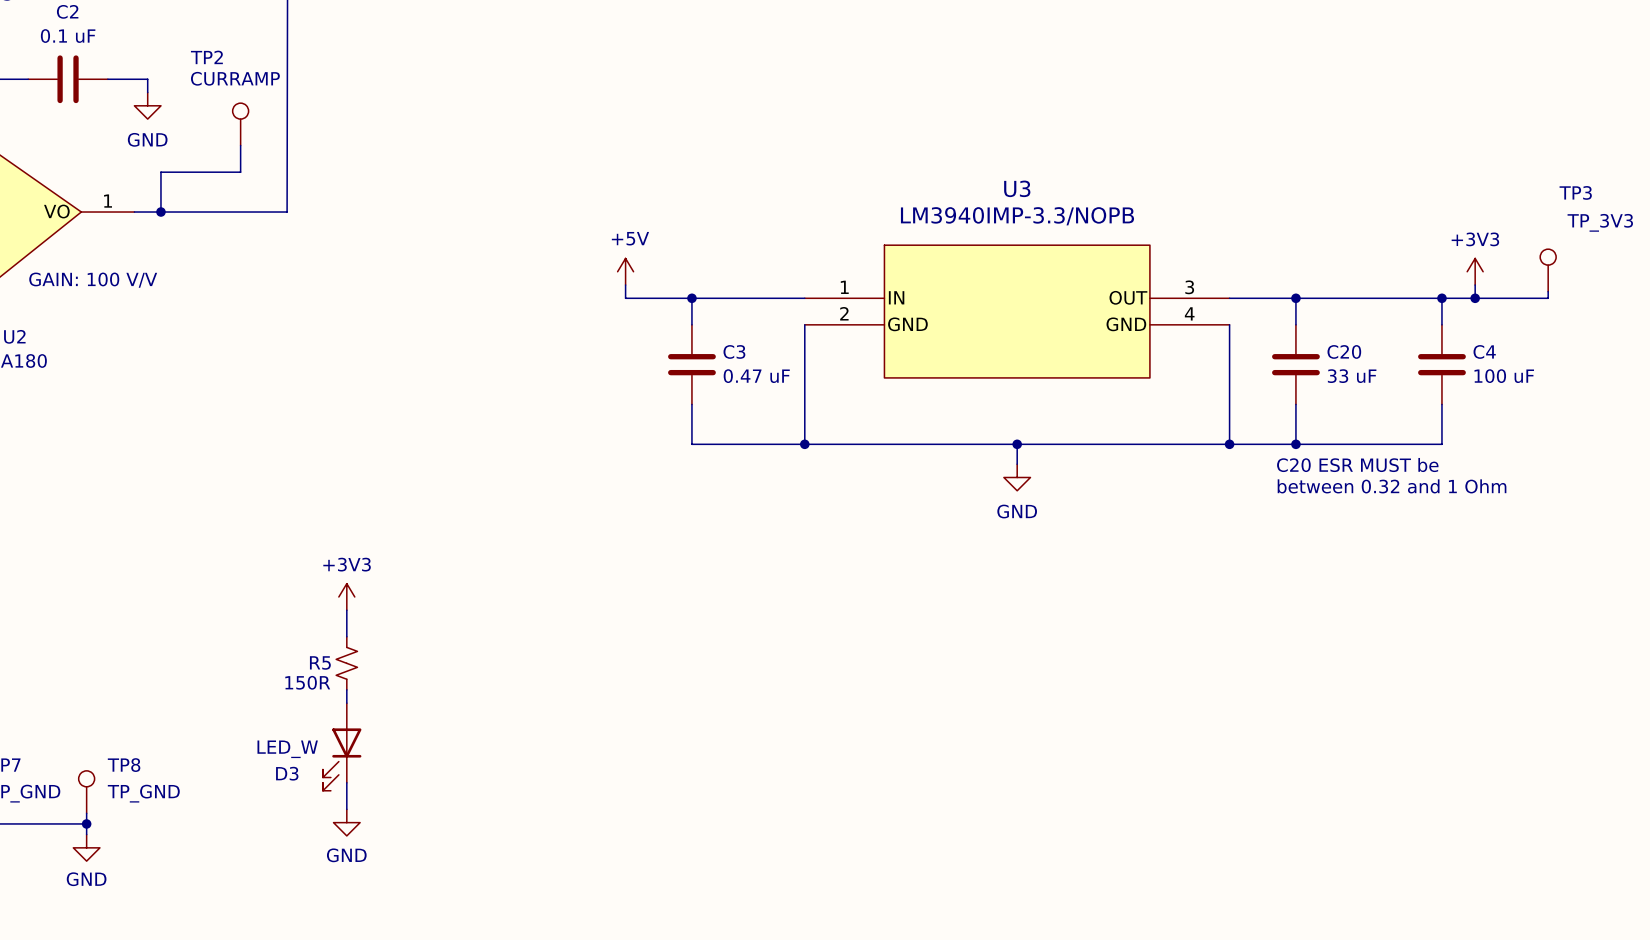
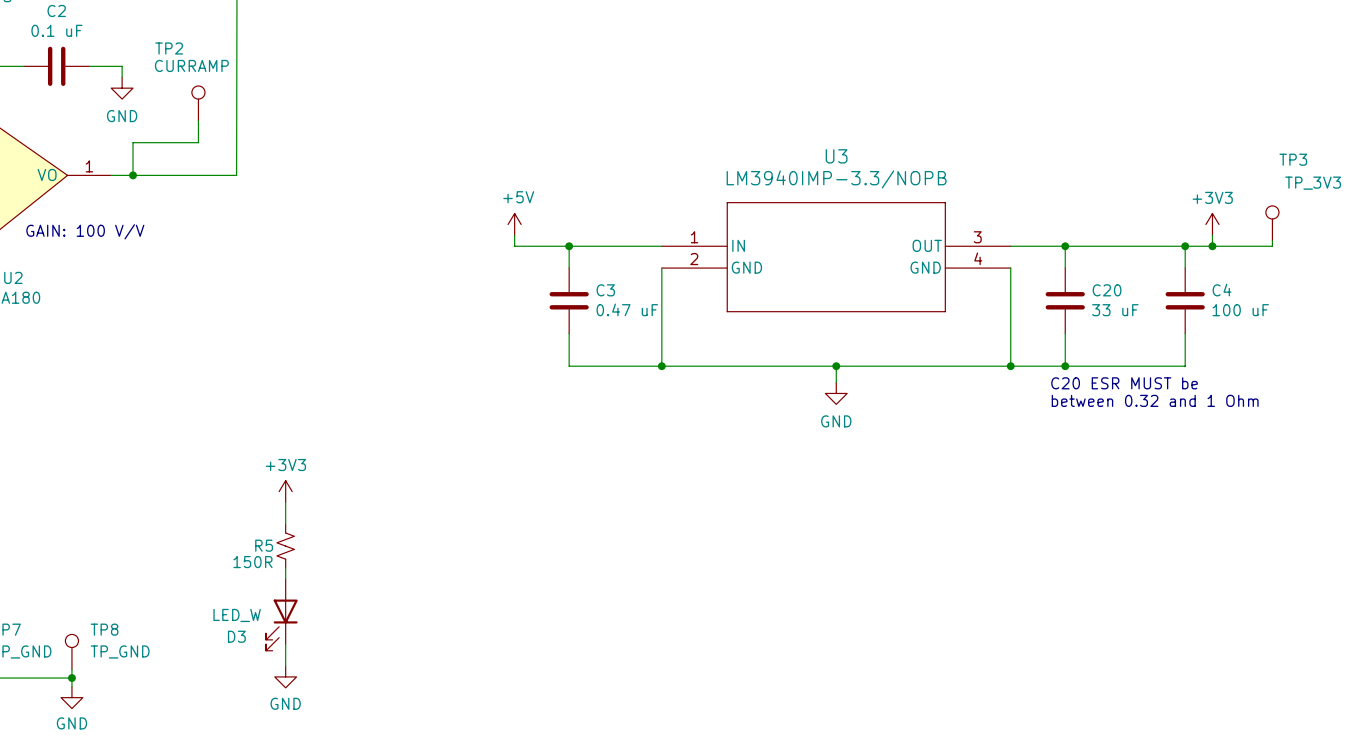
U3 symbol: [804, 245, 1230, 378] -> [661, 202, 1011, 313]

